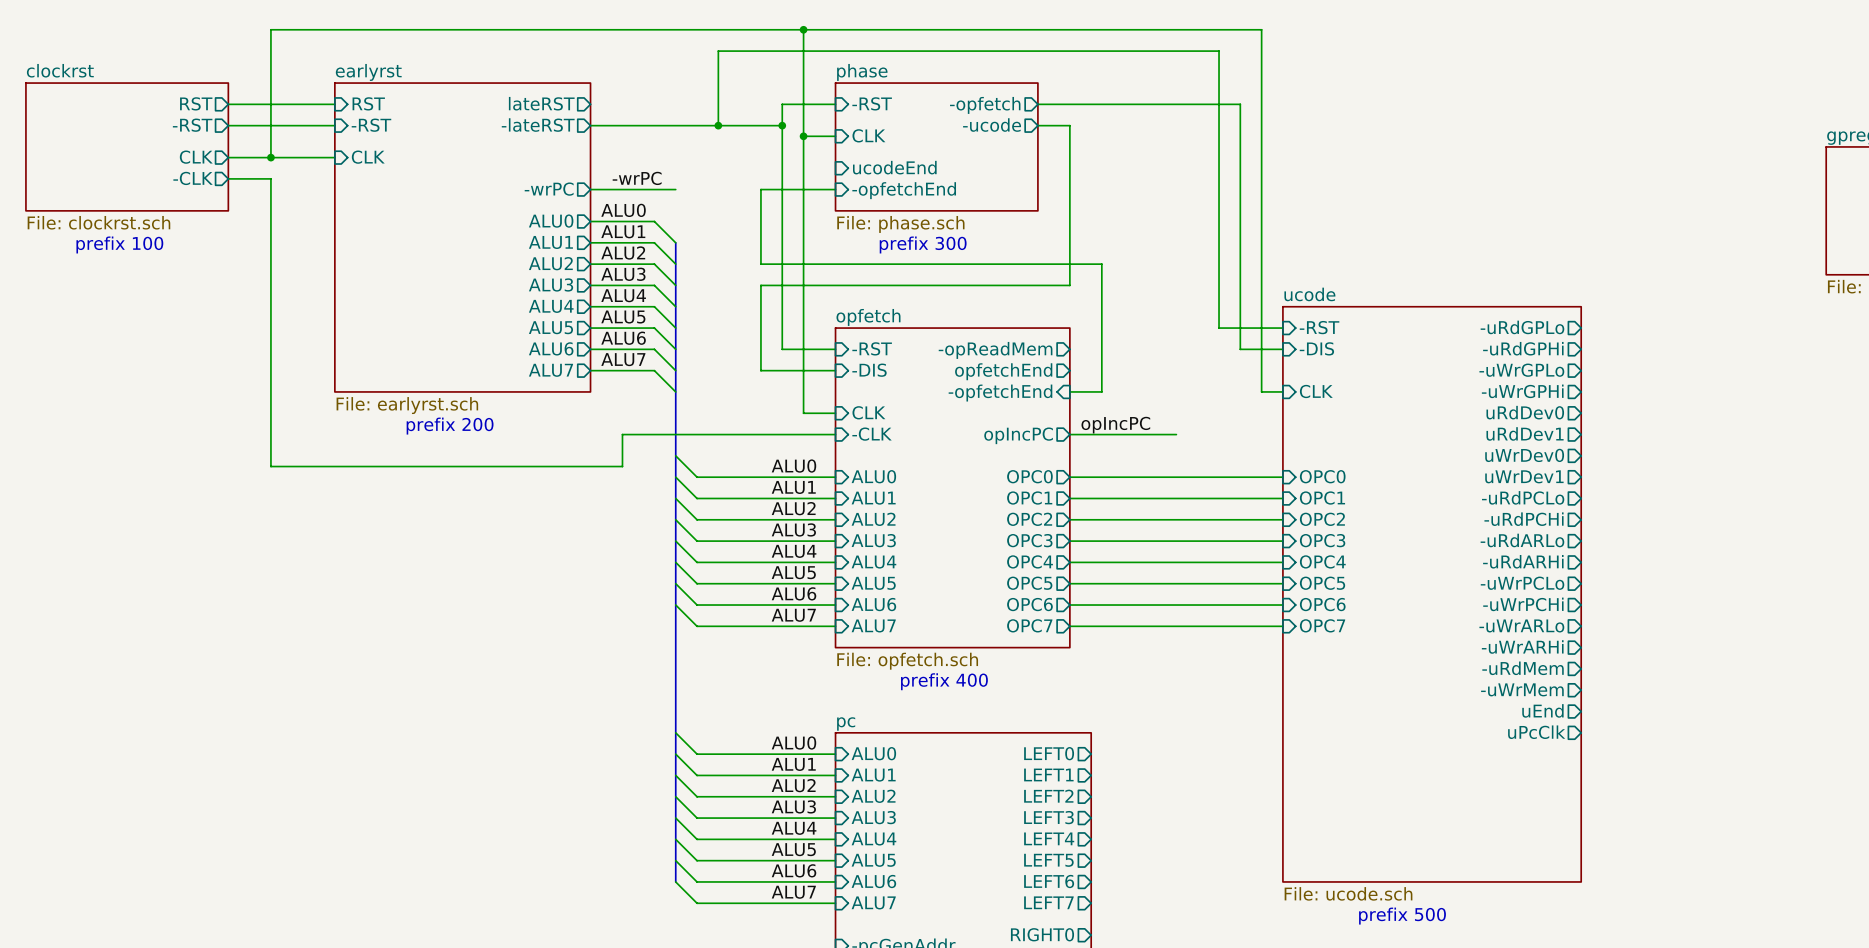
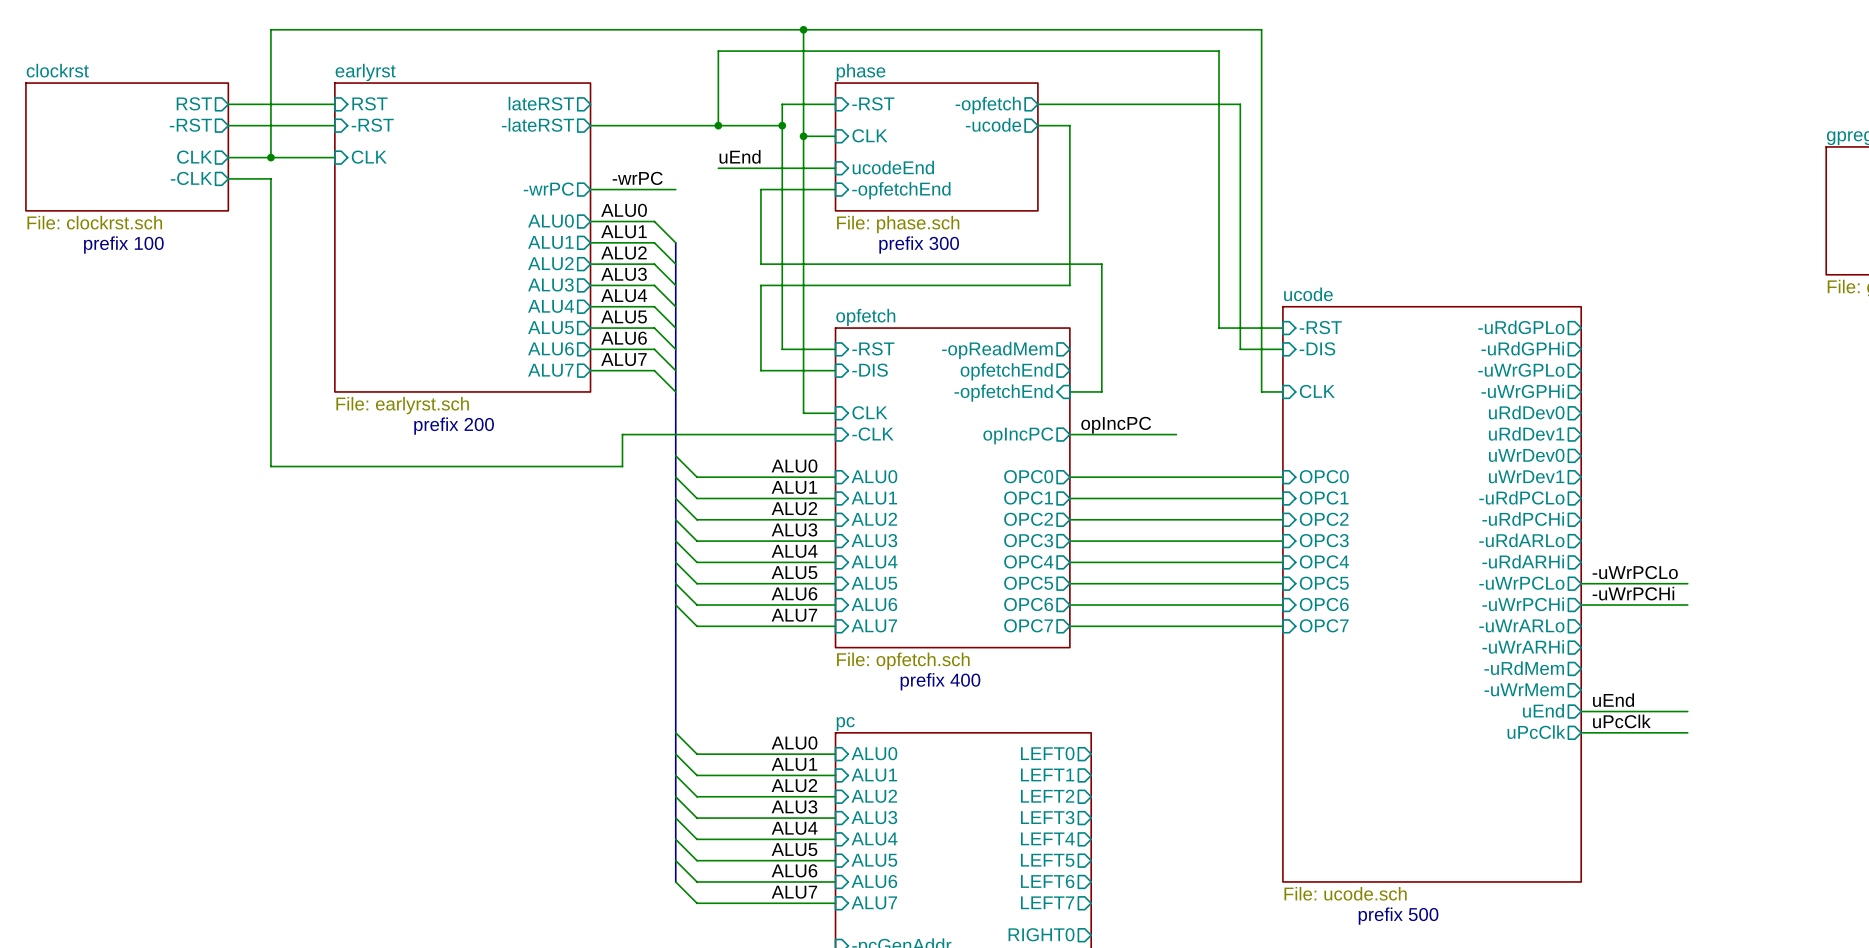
label: none -> uEnd (740, 156)
wire: none -> (718, 168) (835, 168)
label: none -> -uWrPCLo (1635, 572)
wire: none -> (1581, 583) (1687, 583)
label: none -> -uWrPCHi (1633, 593)
wire: none -> (1581, 605) (1687, 605)
label: none -> uEnd (1613, 700)
wire: none -> (1581, 711) (1687, 711)
label: none -> uPcClk (1621, 721)
wire: none -> (1581, 732) (1687, 732)

